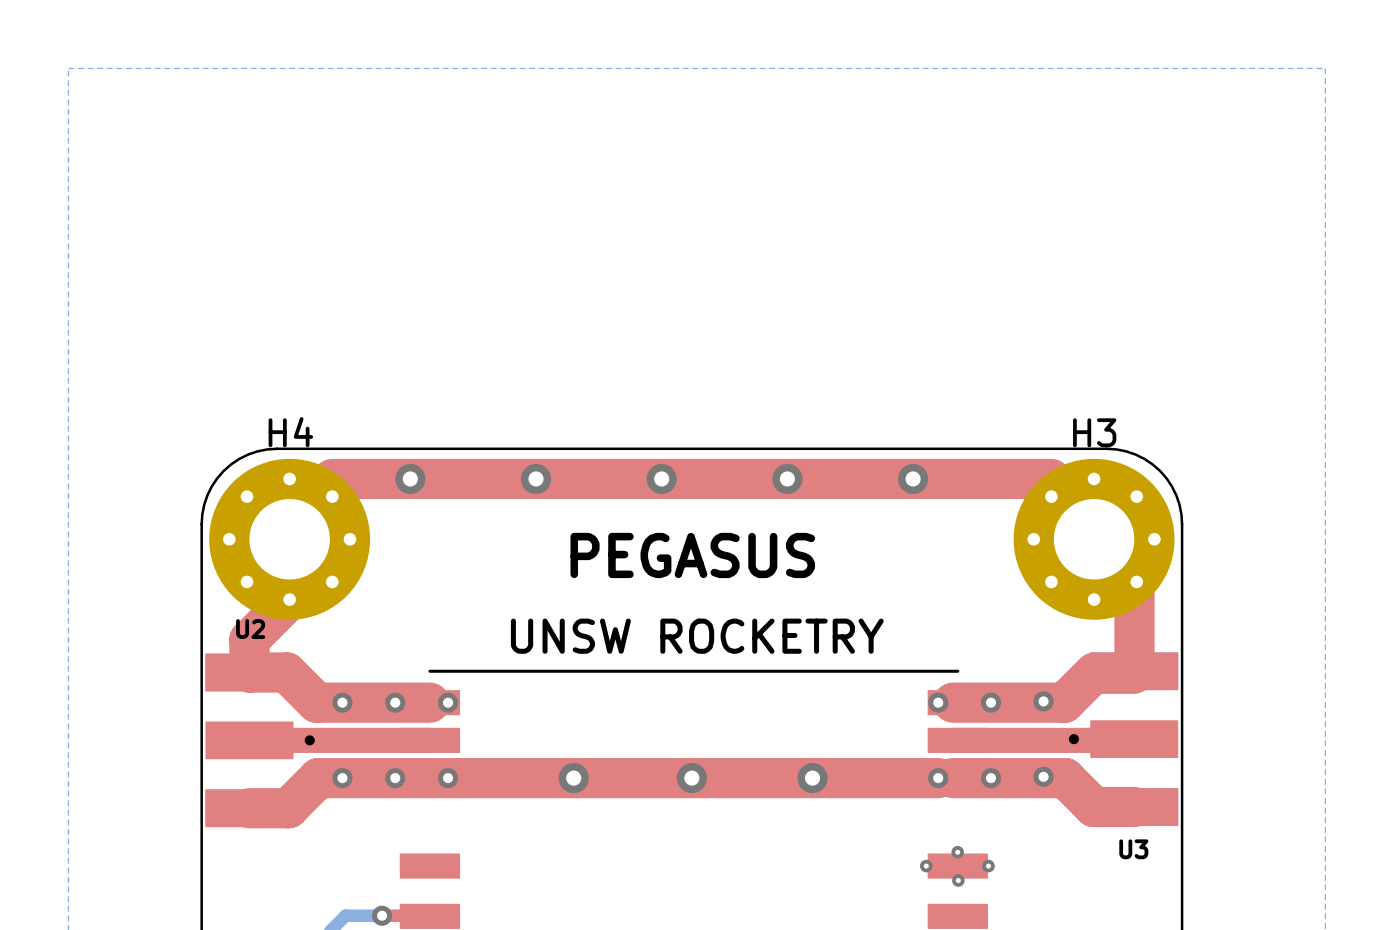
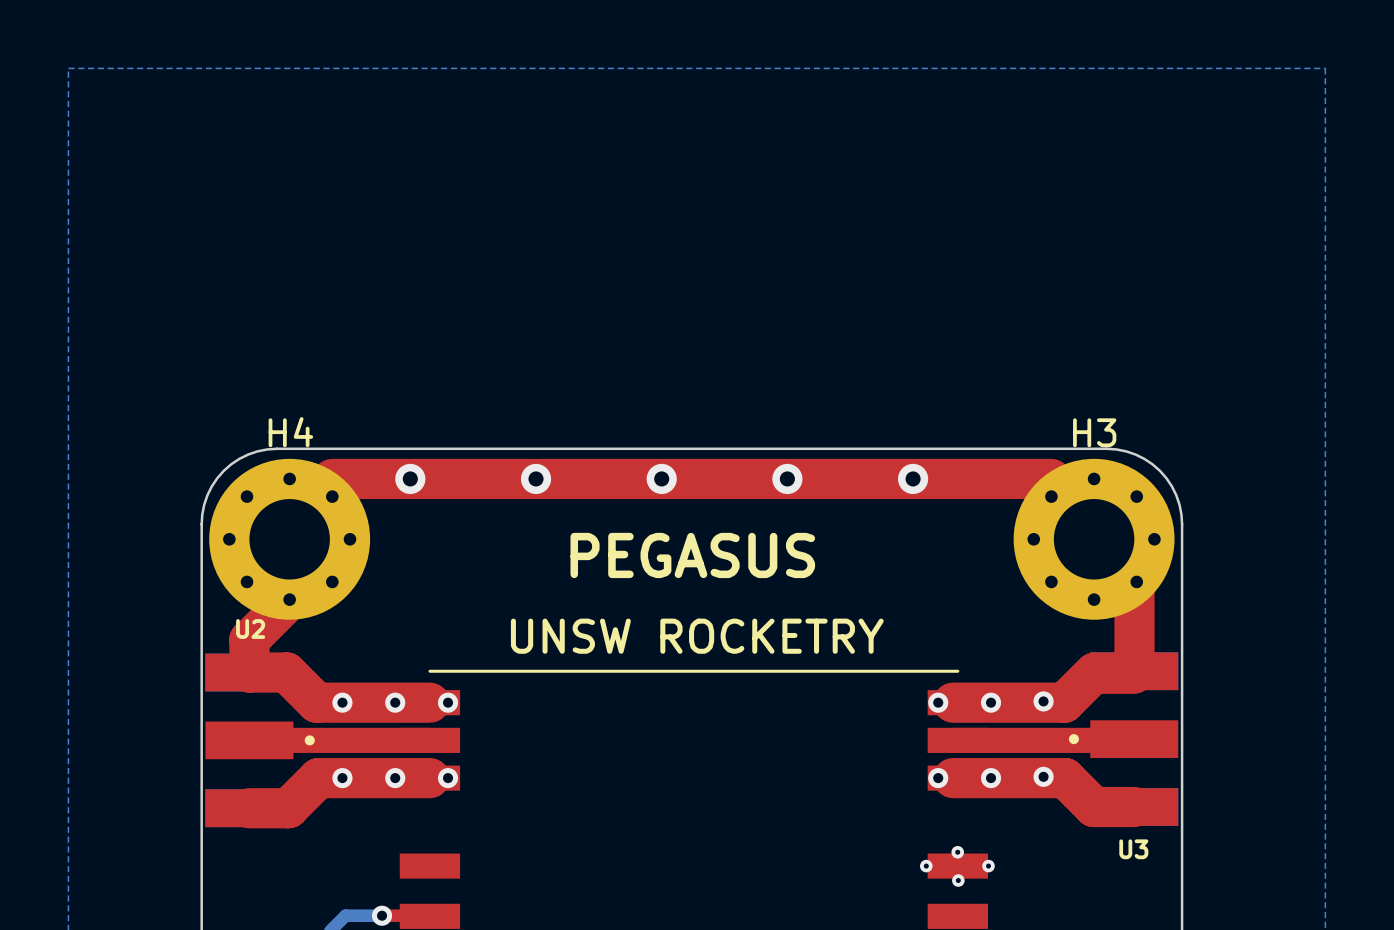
top track: (429, 778) (938, 778) -> none
via: (573, 778) -> none
via: (691, 778) -> none
via: (812, 778) -> none

